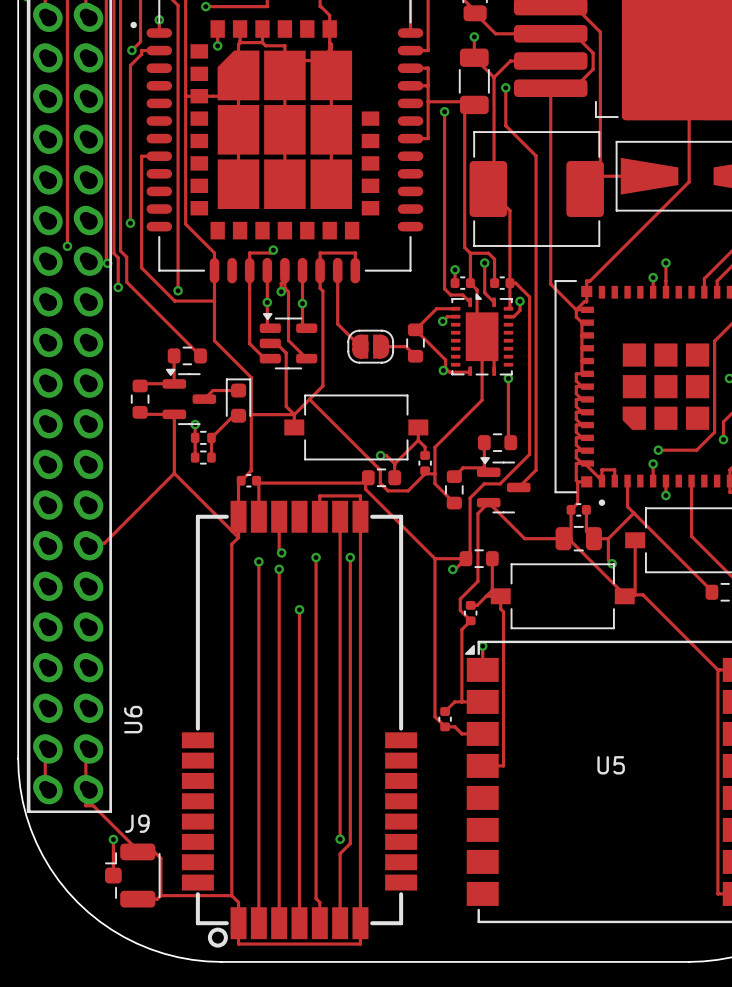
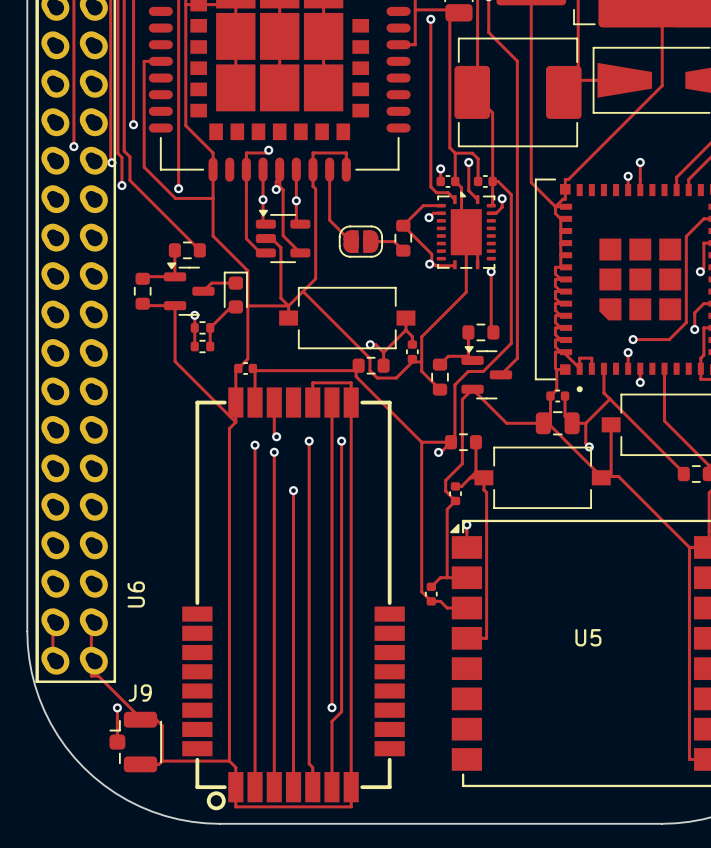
track: (174, 473) (104, 543) (85, 543) -> none

